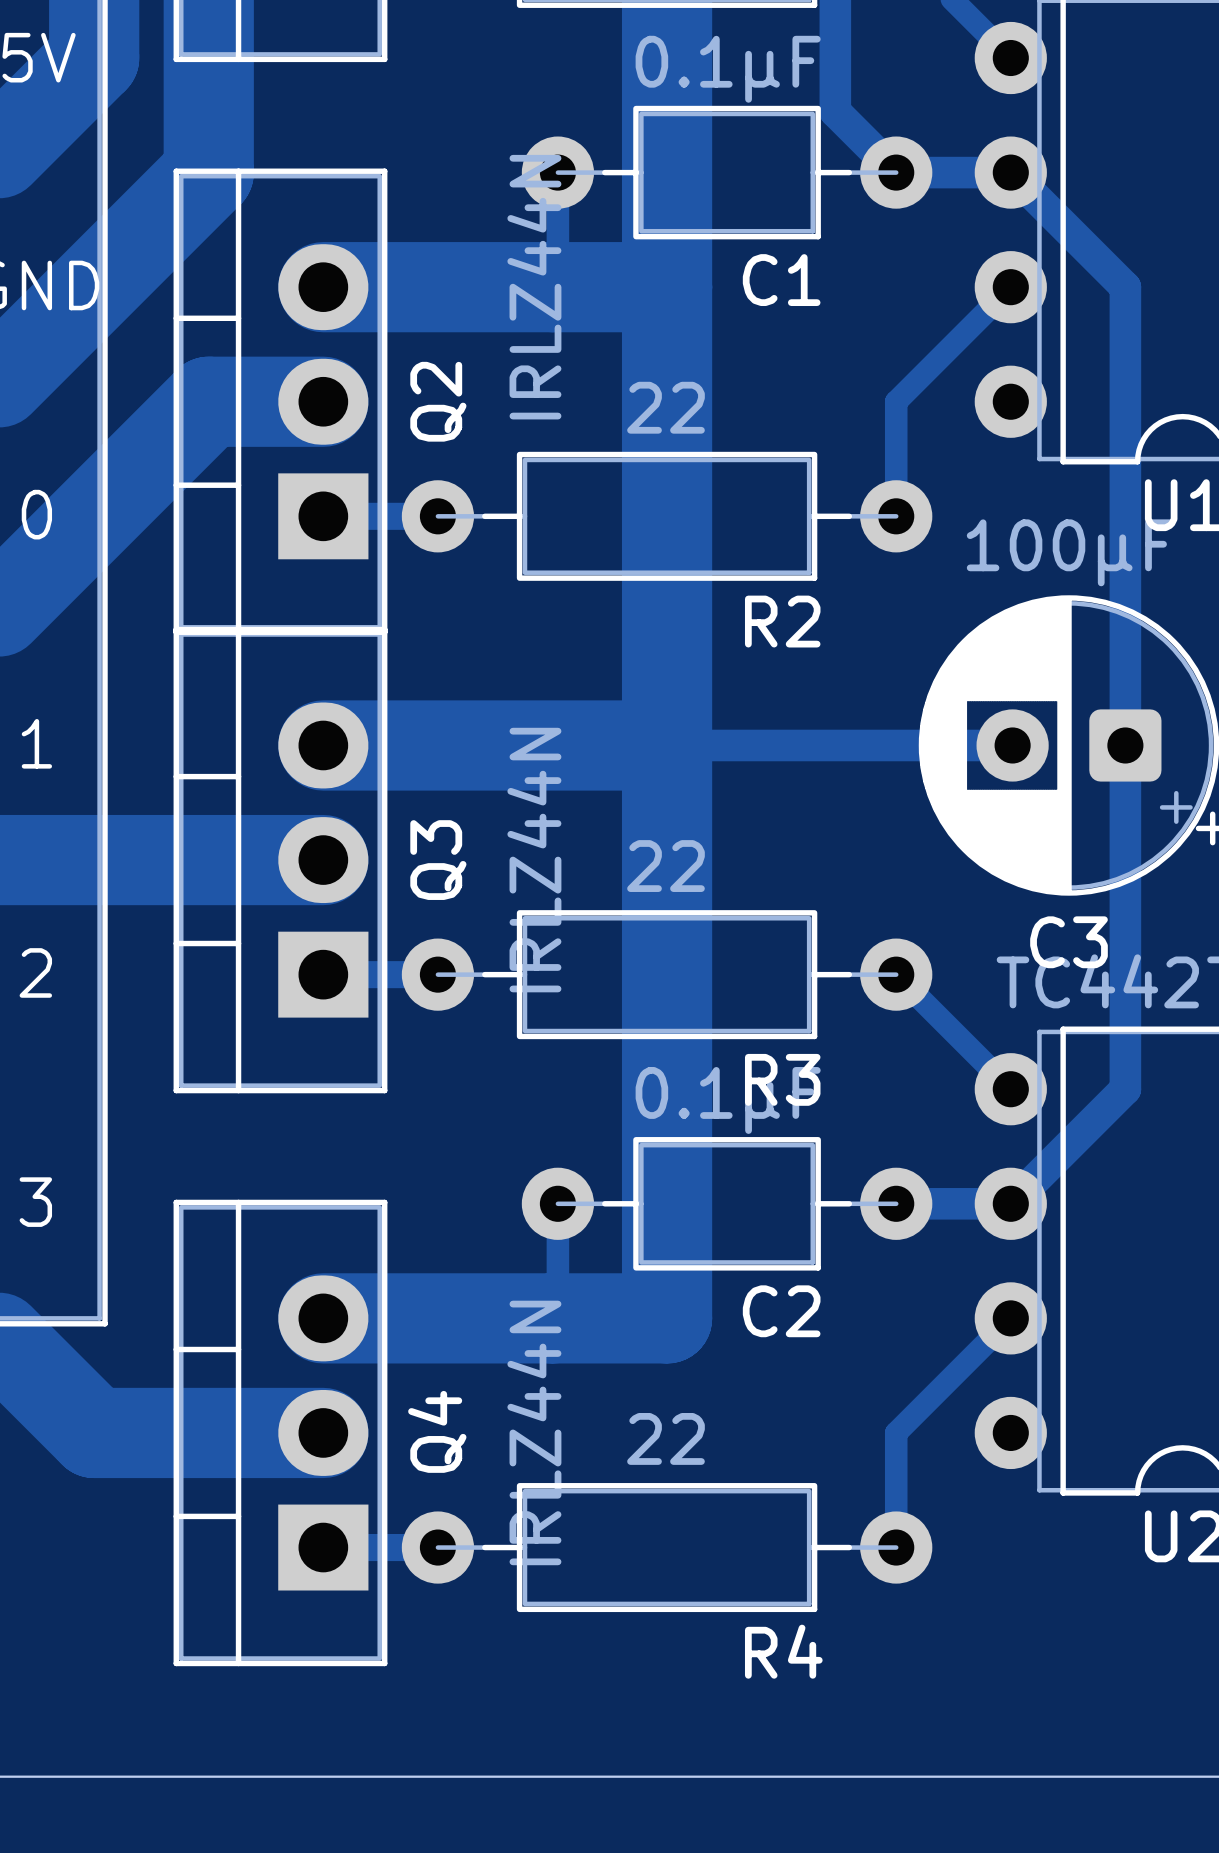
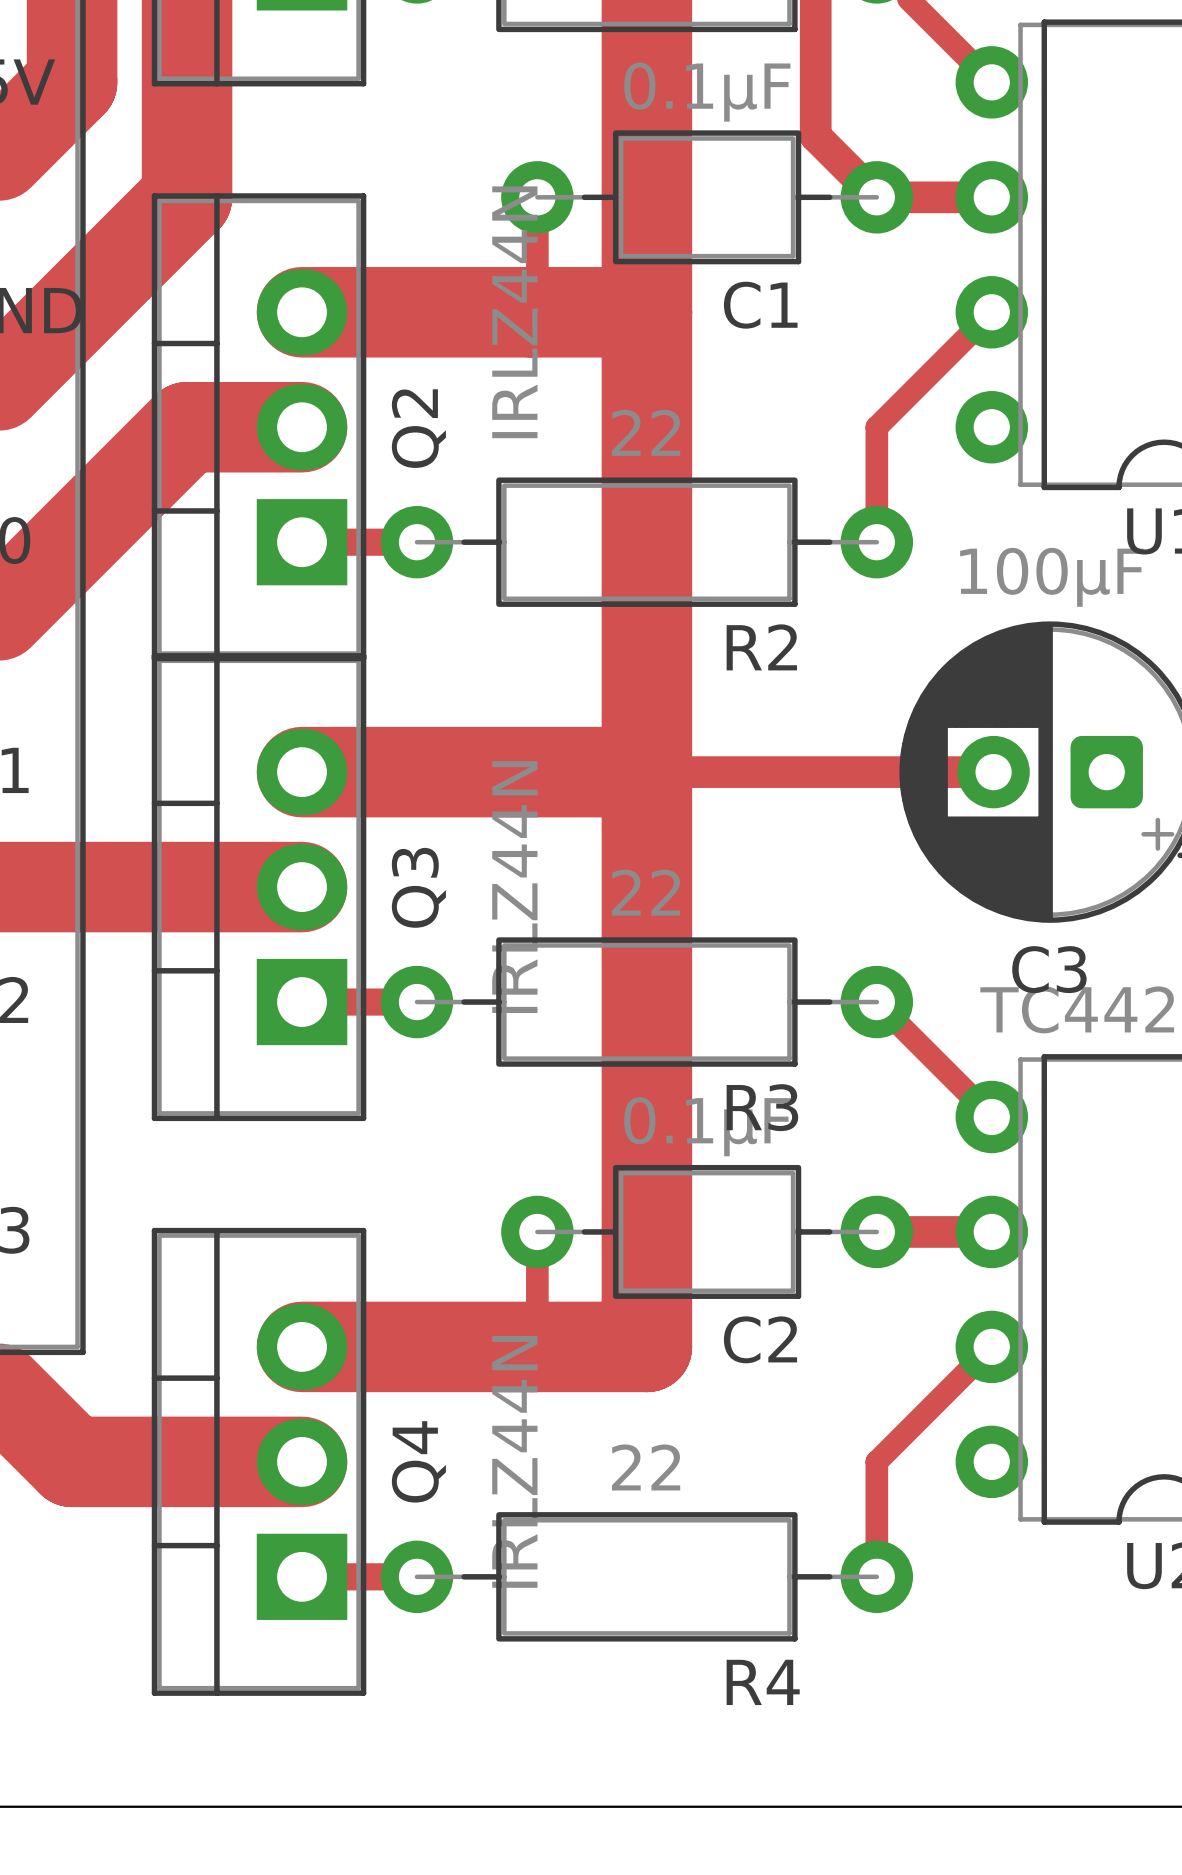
track: (1010, 172) (1125, 287) (1125, 1089) (1010, 1203) -> none

